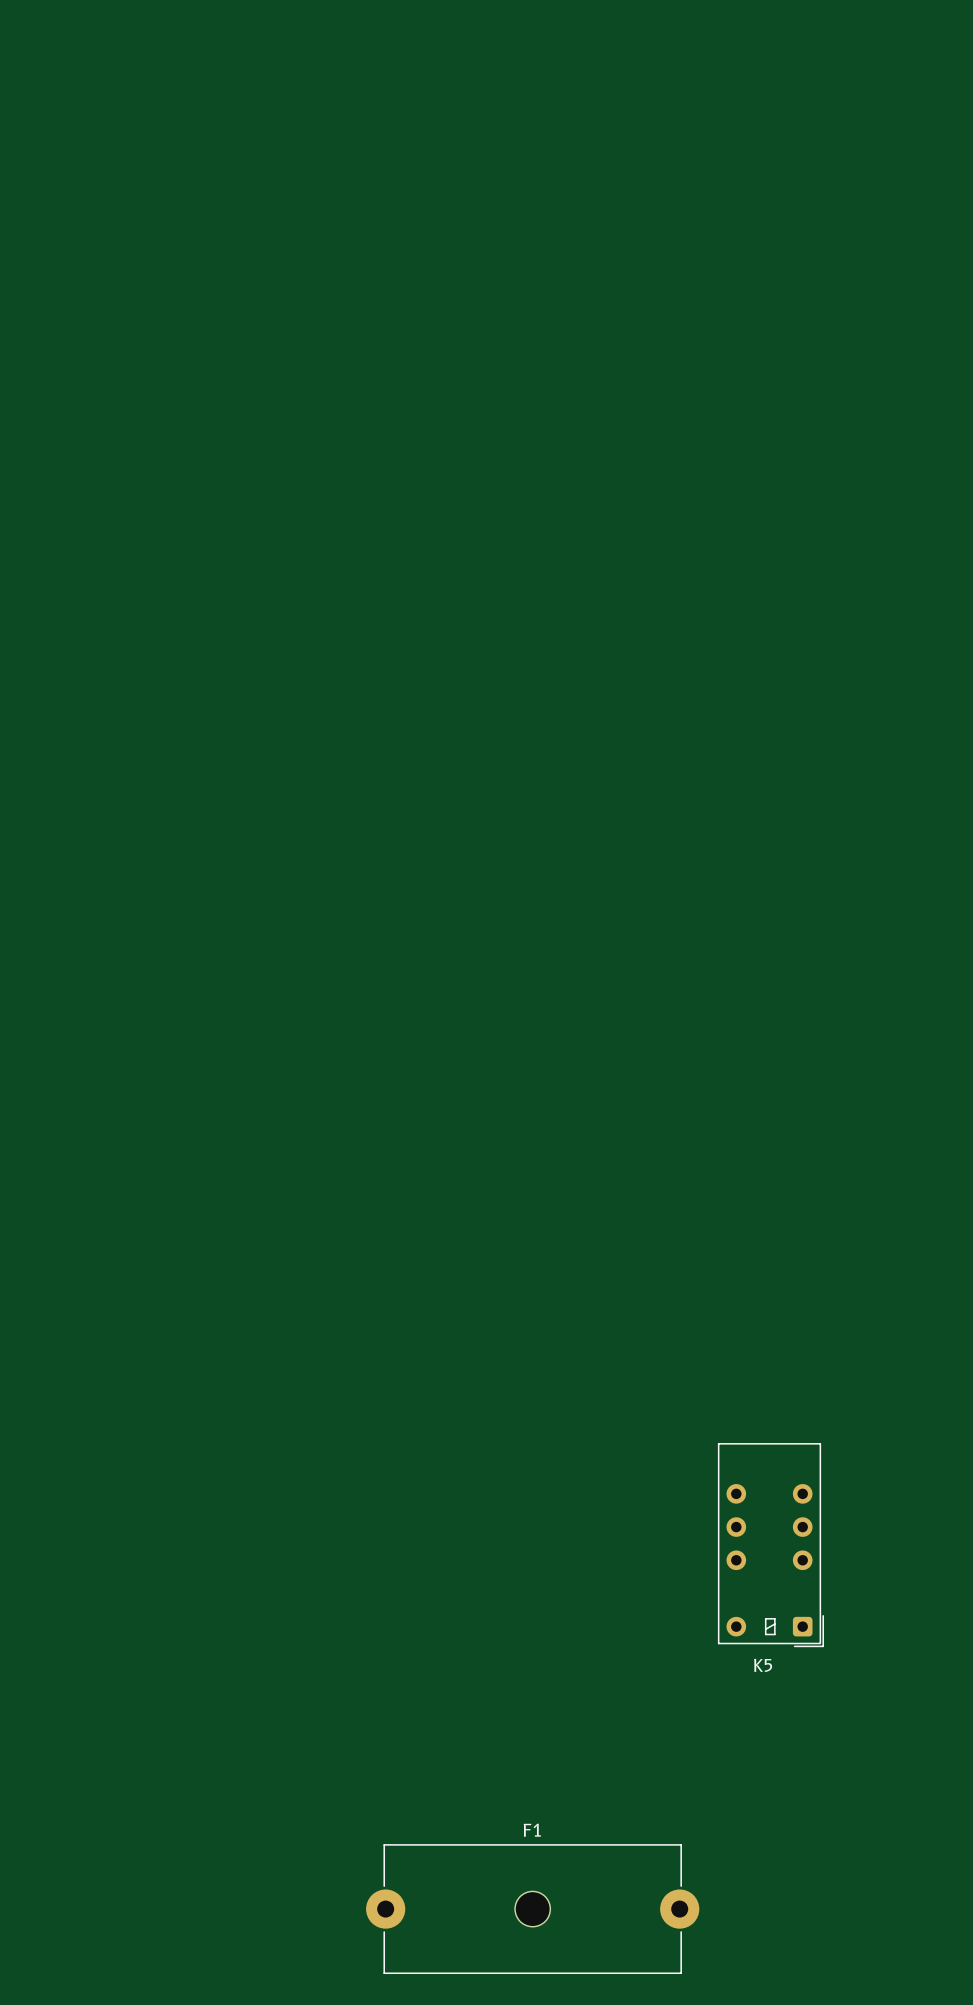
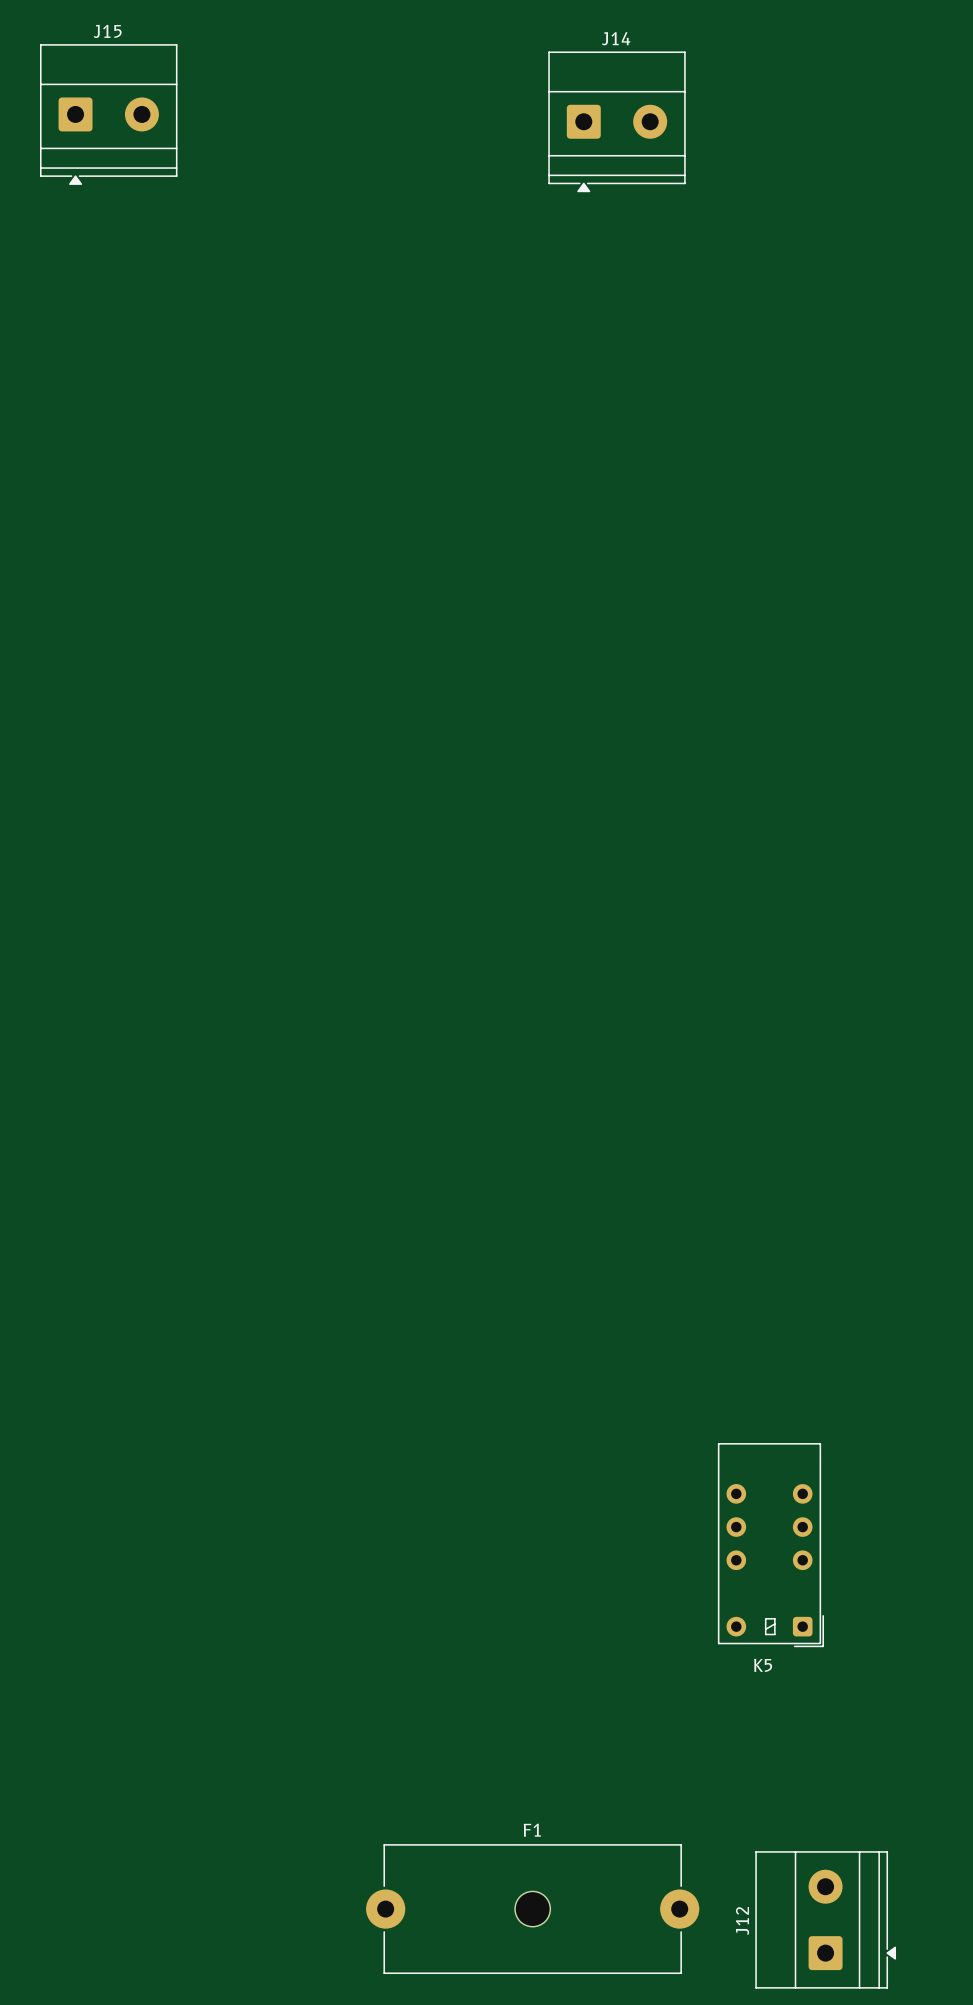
J15: none -> (108, 114)
J14: none -> (616, 121)
J12: none -> (825, 1919)

